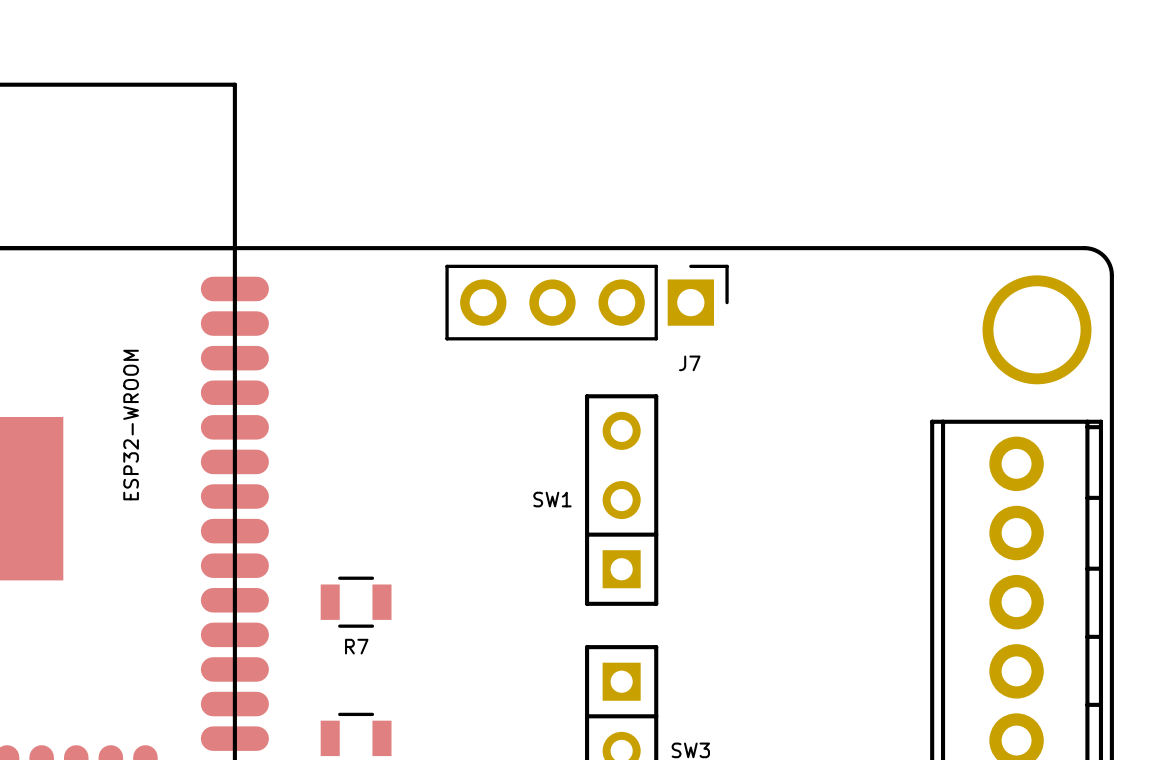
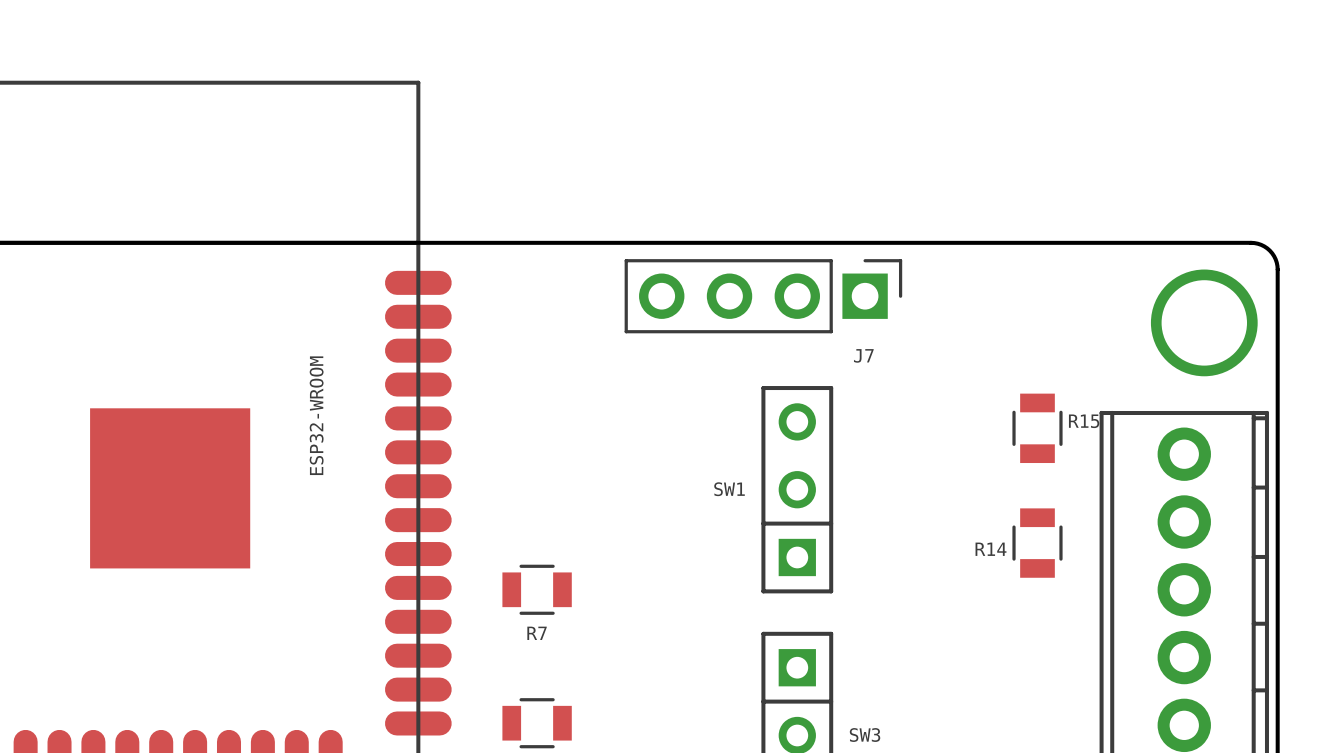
R15: none -> (1037, 428)
R14: none -> (1037, 543)

